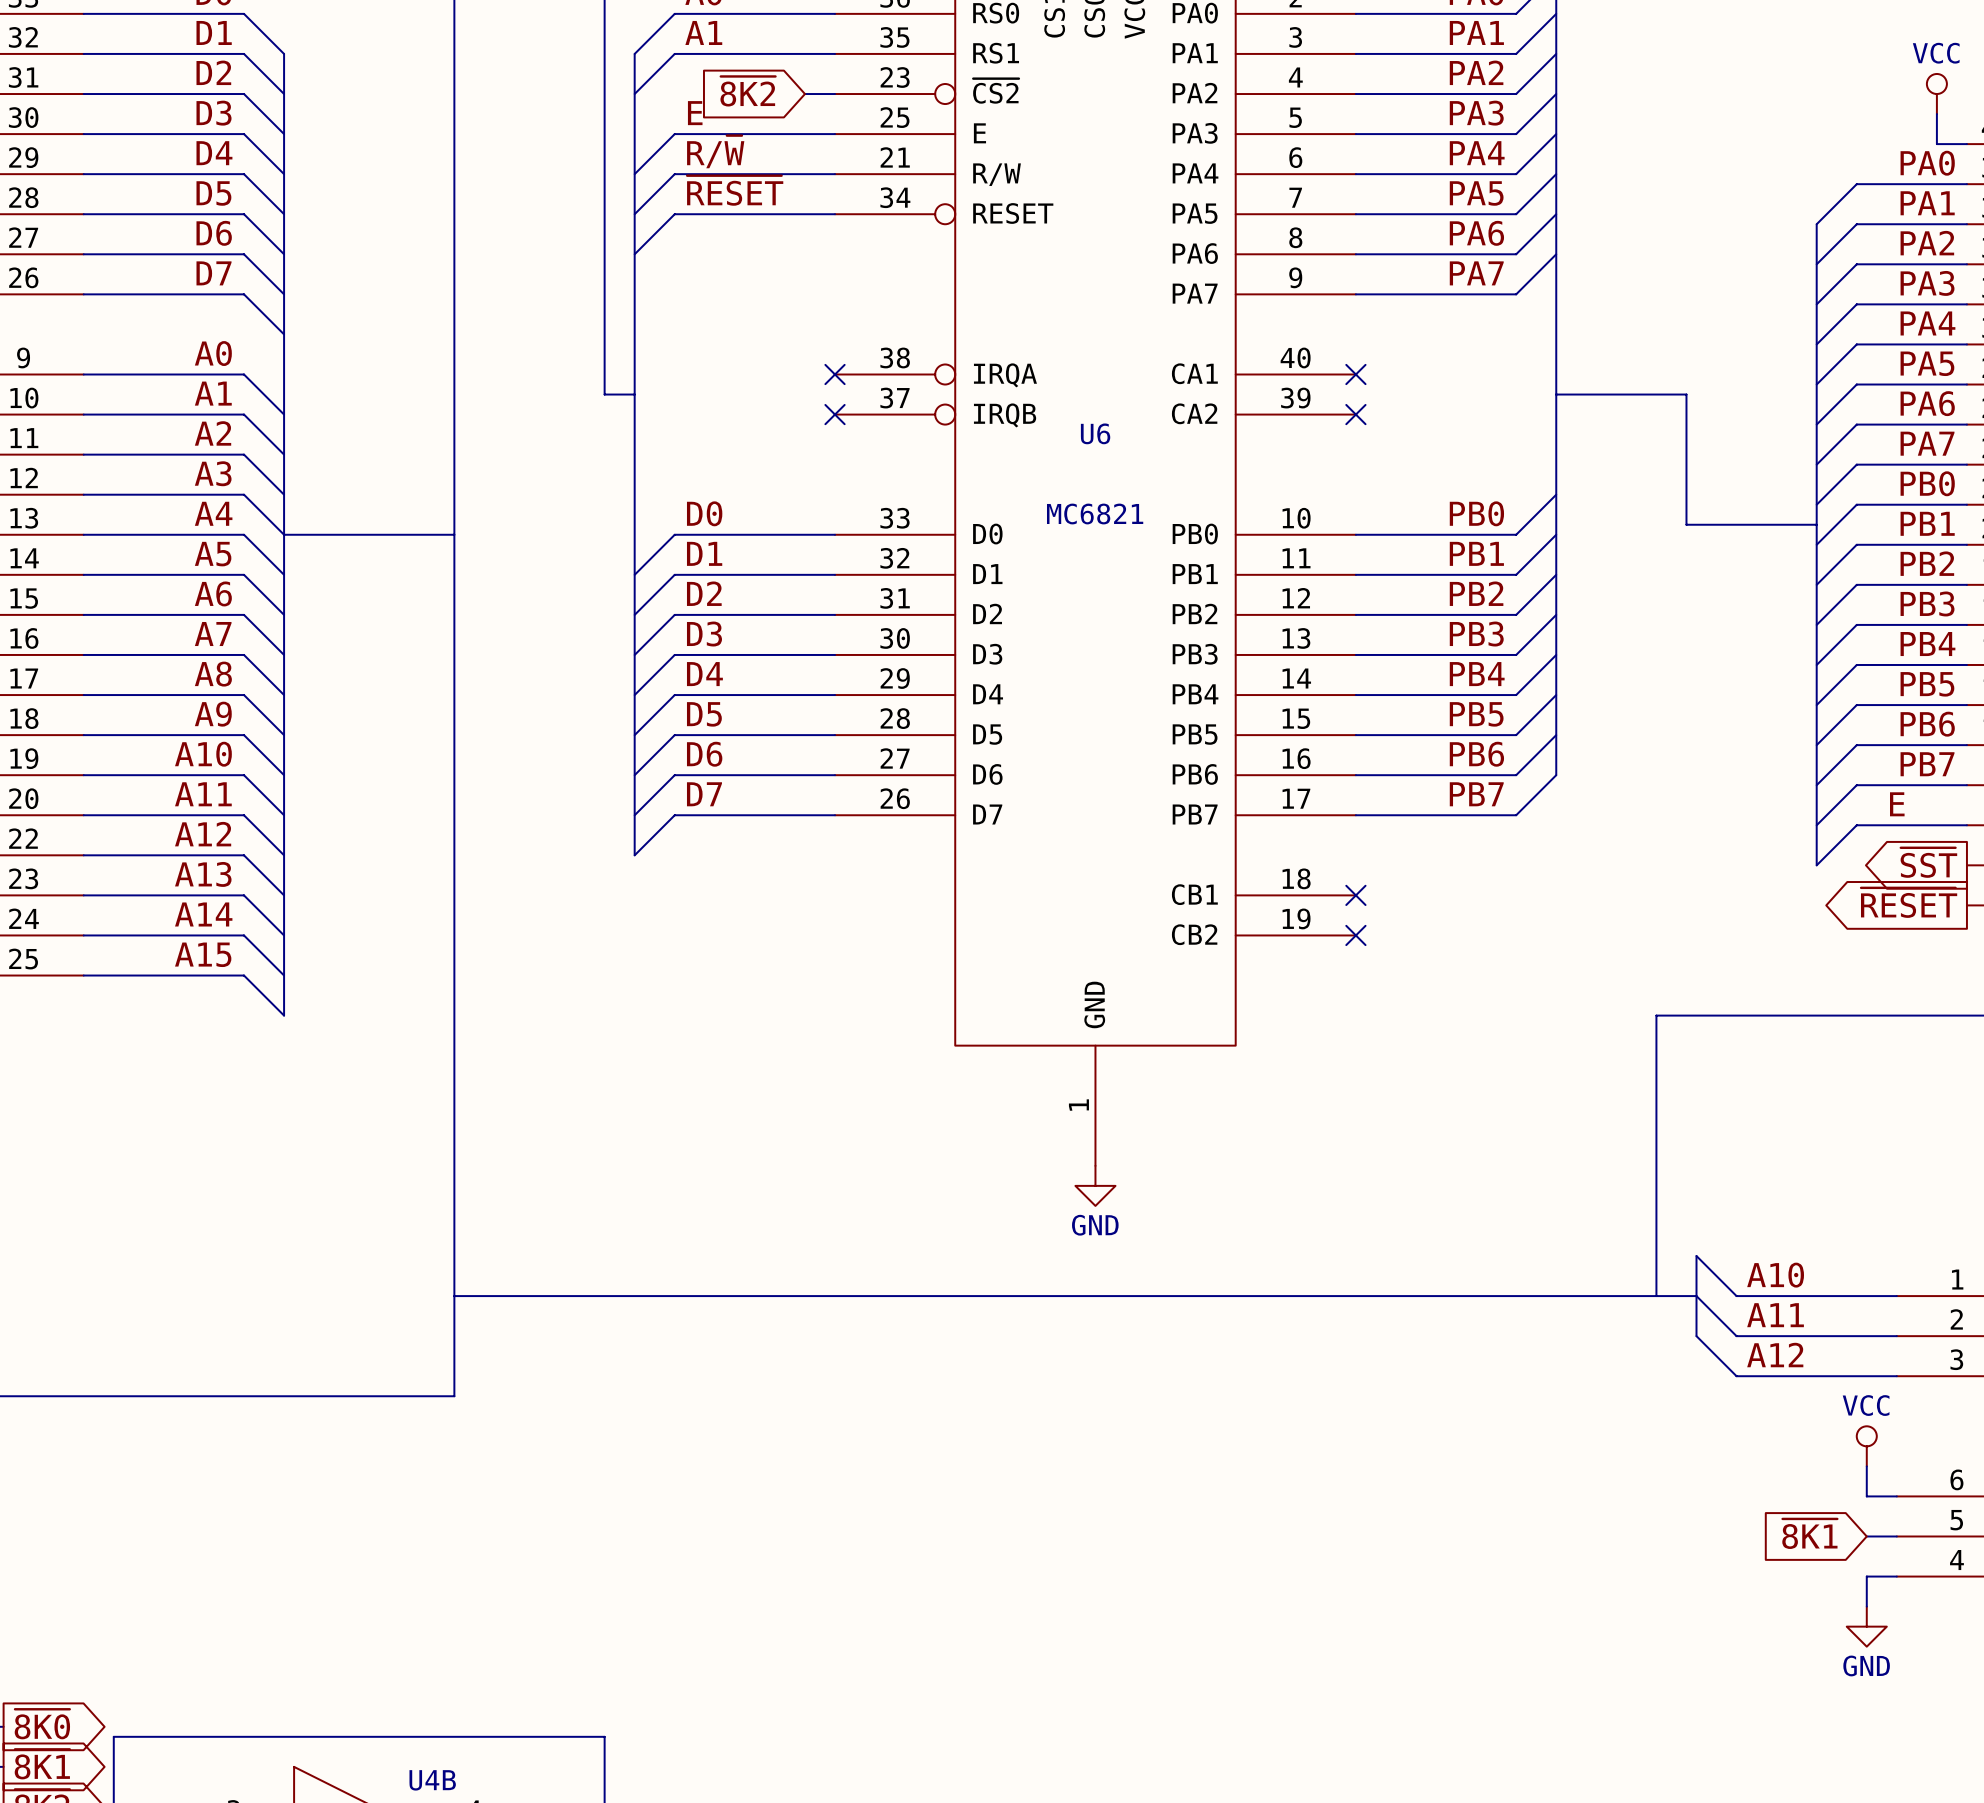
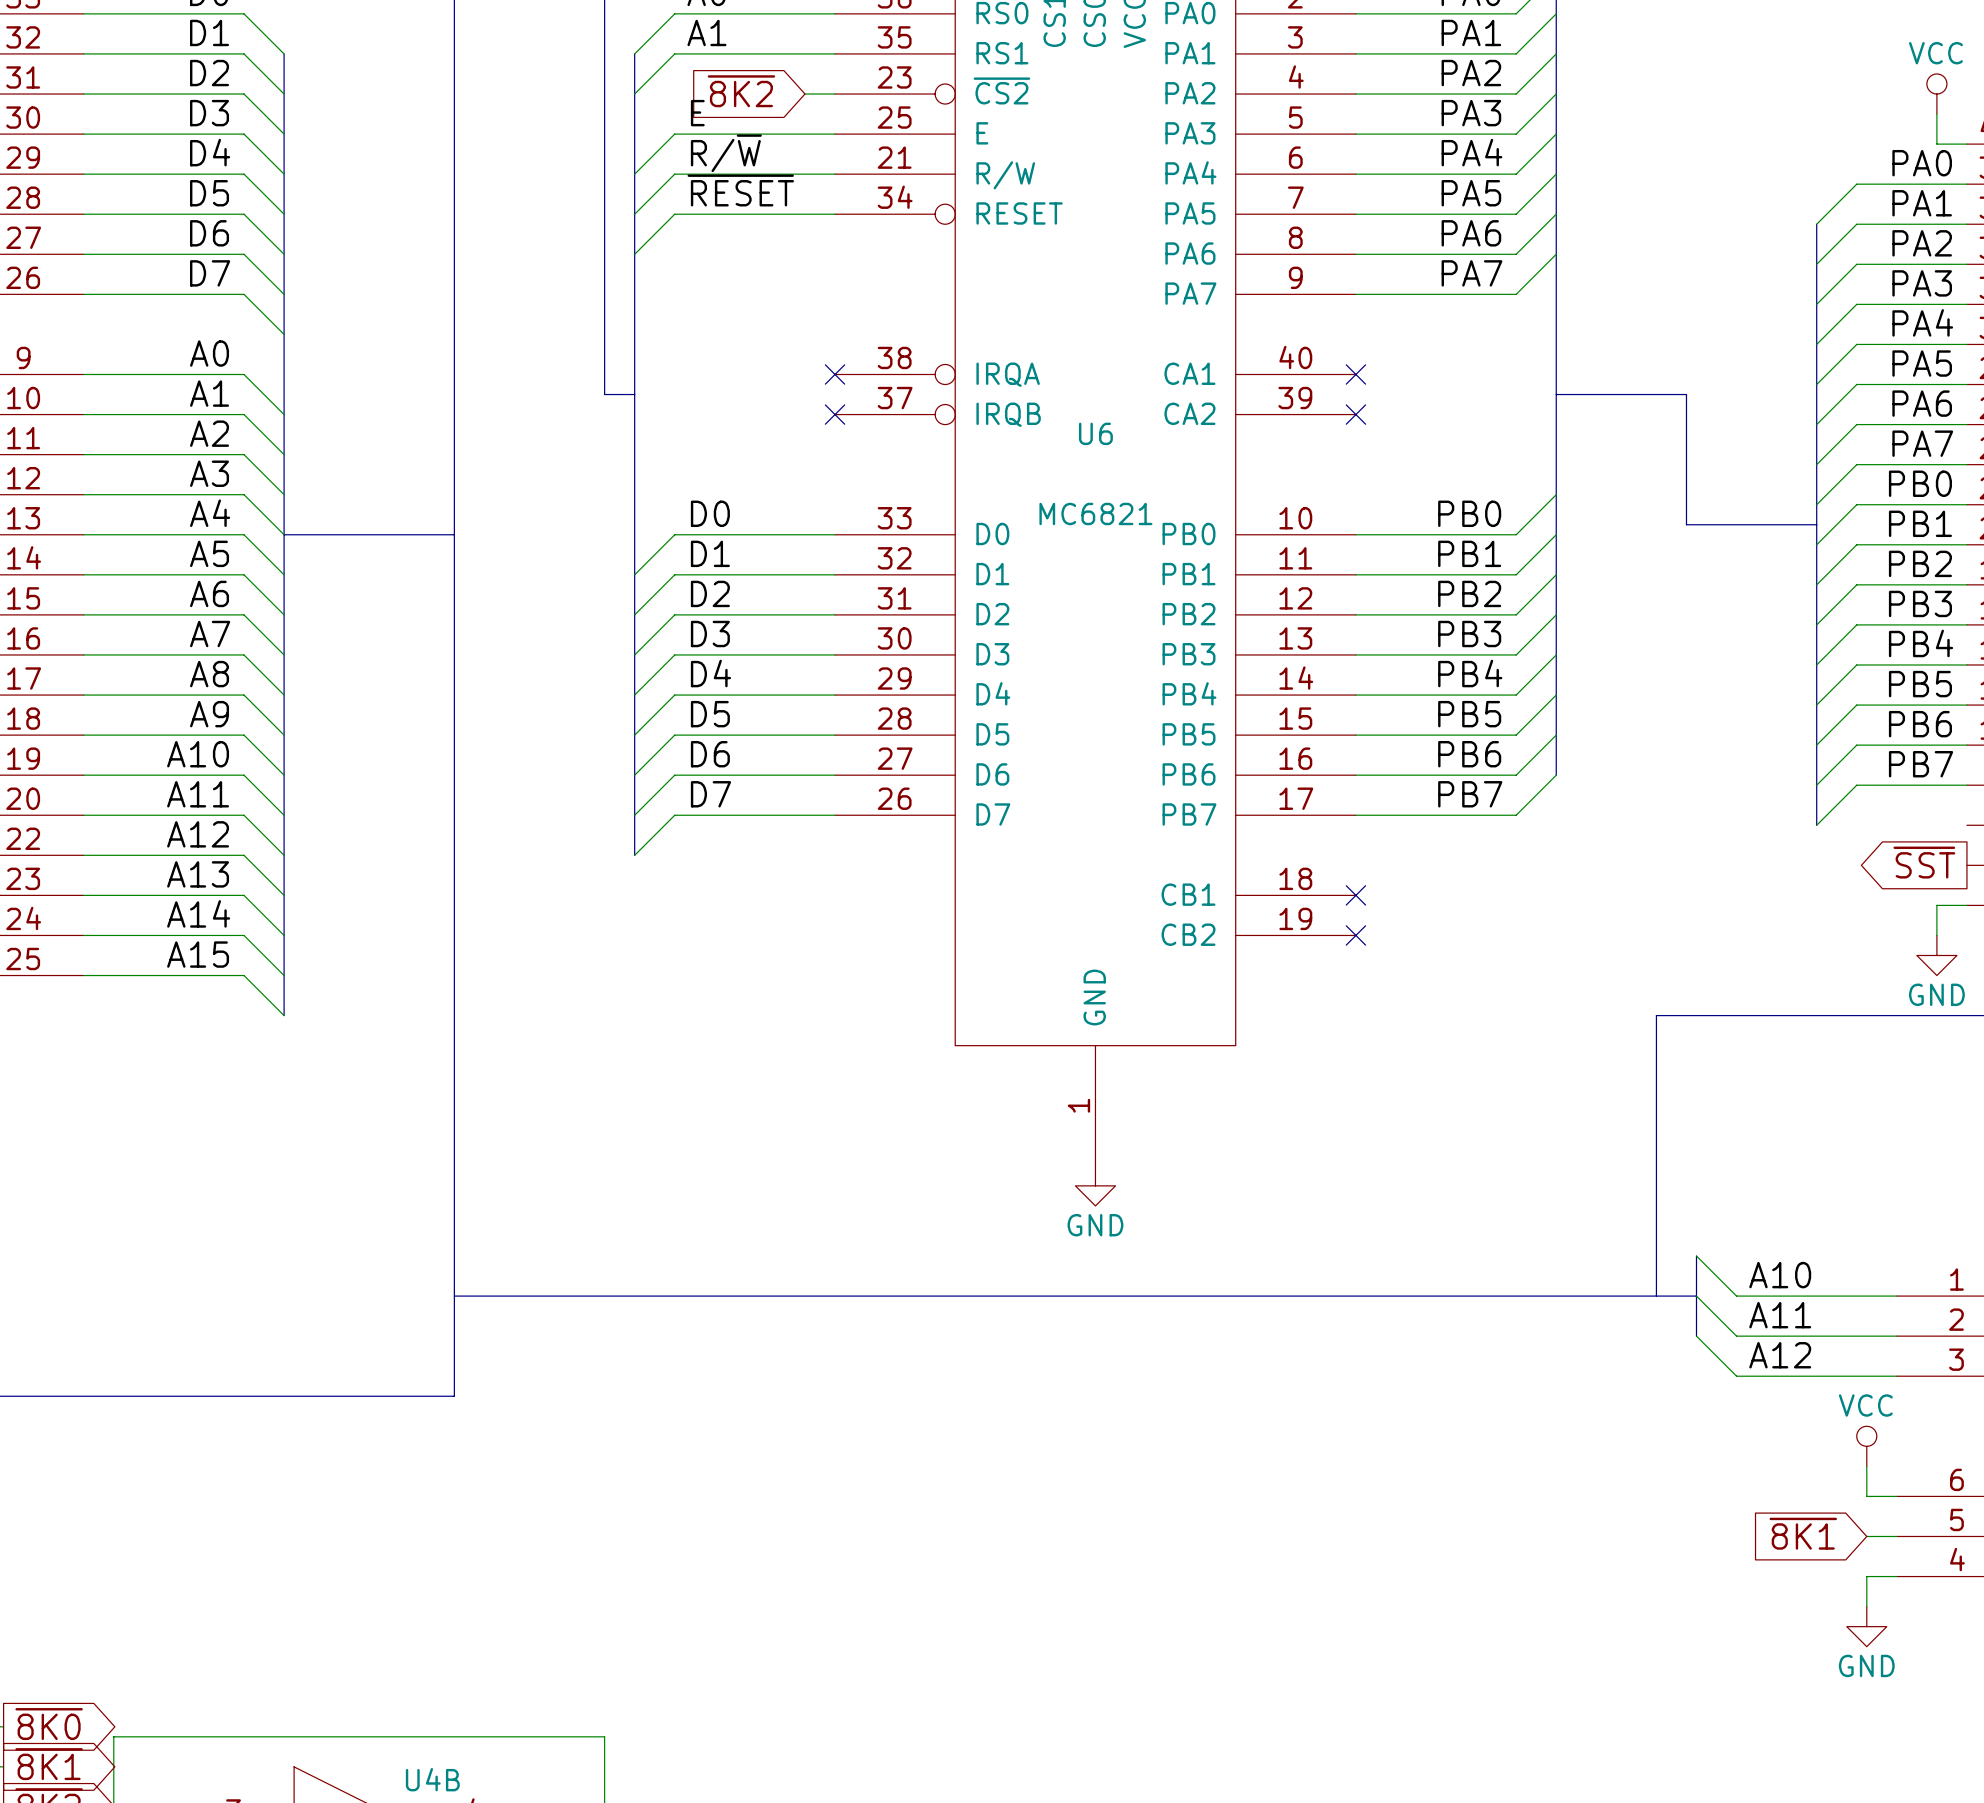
label: E (1897, 804) -> none
bus: (1816, 825) (1816, 865) -> none
wire: (1966, 825) (1856, 825) (1816, 865) -> none
global label: ~{RESET} (1909, 902) -> none
wire: none -> (1966, 905) (1936, 905) (1936, 935)
power symbol: none -> GND (1936, 955)

